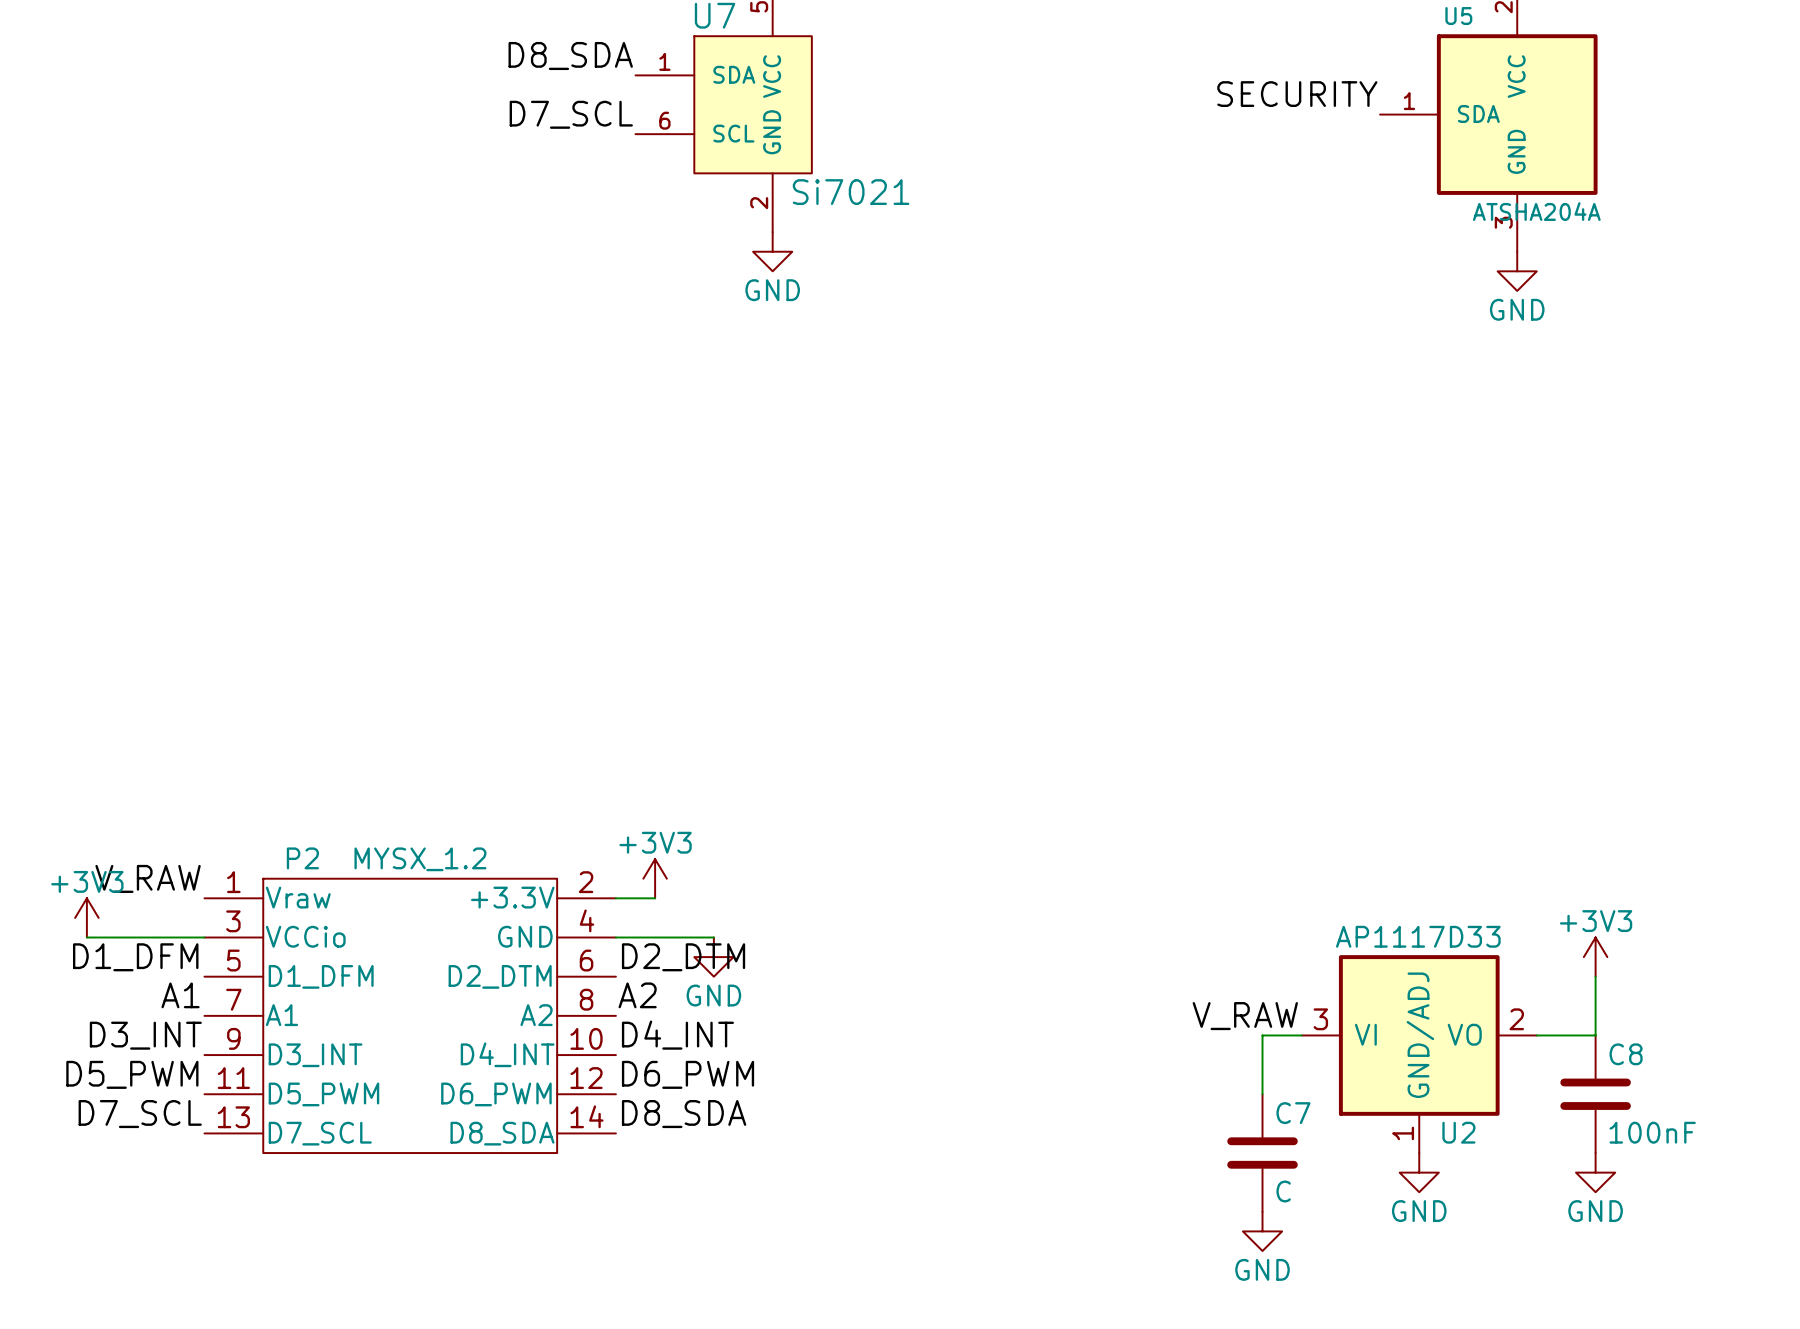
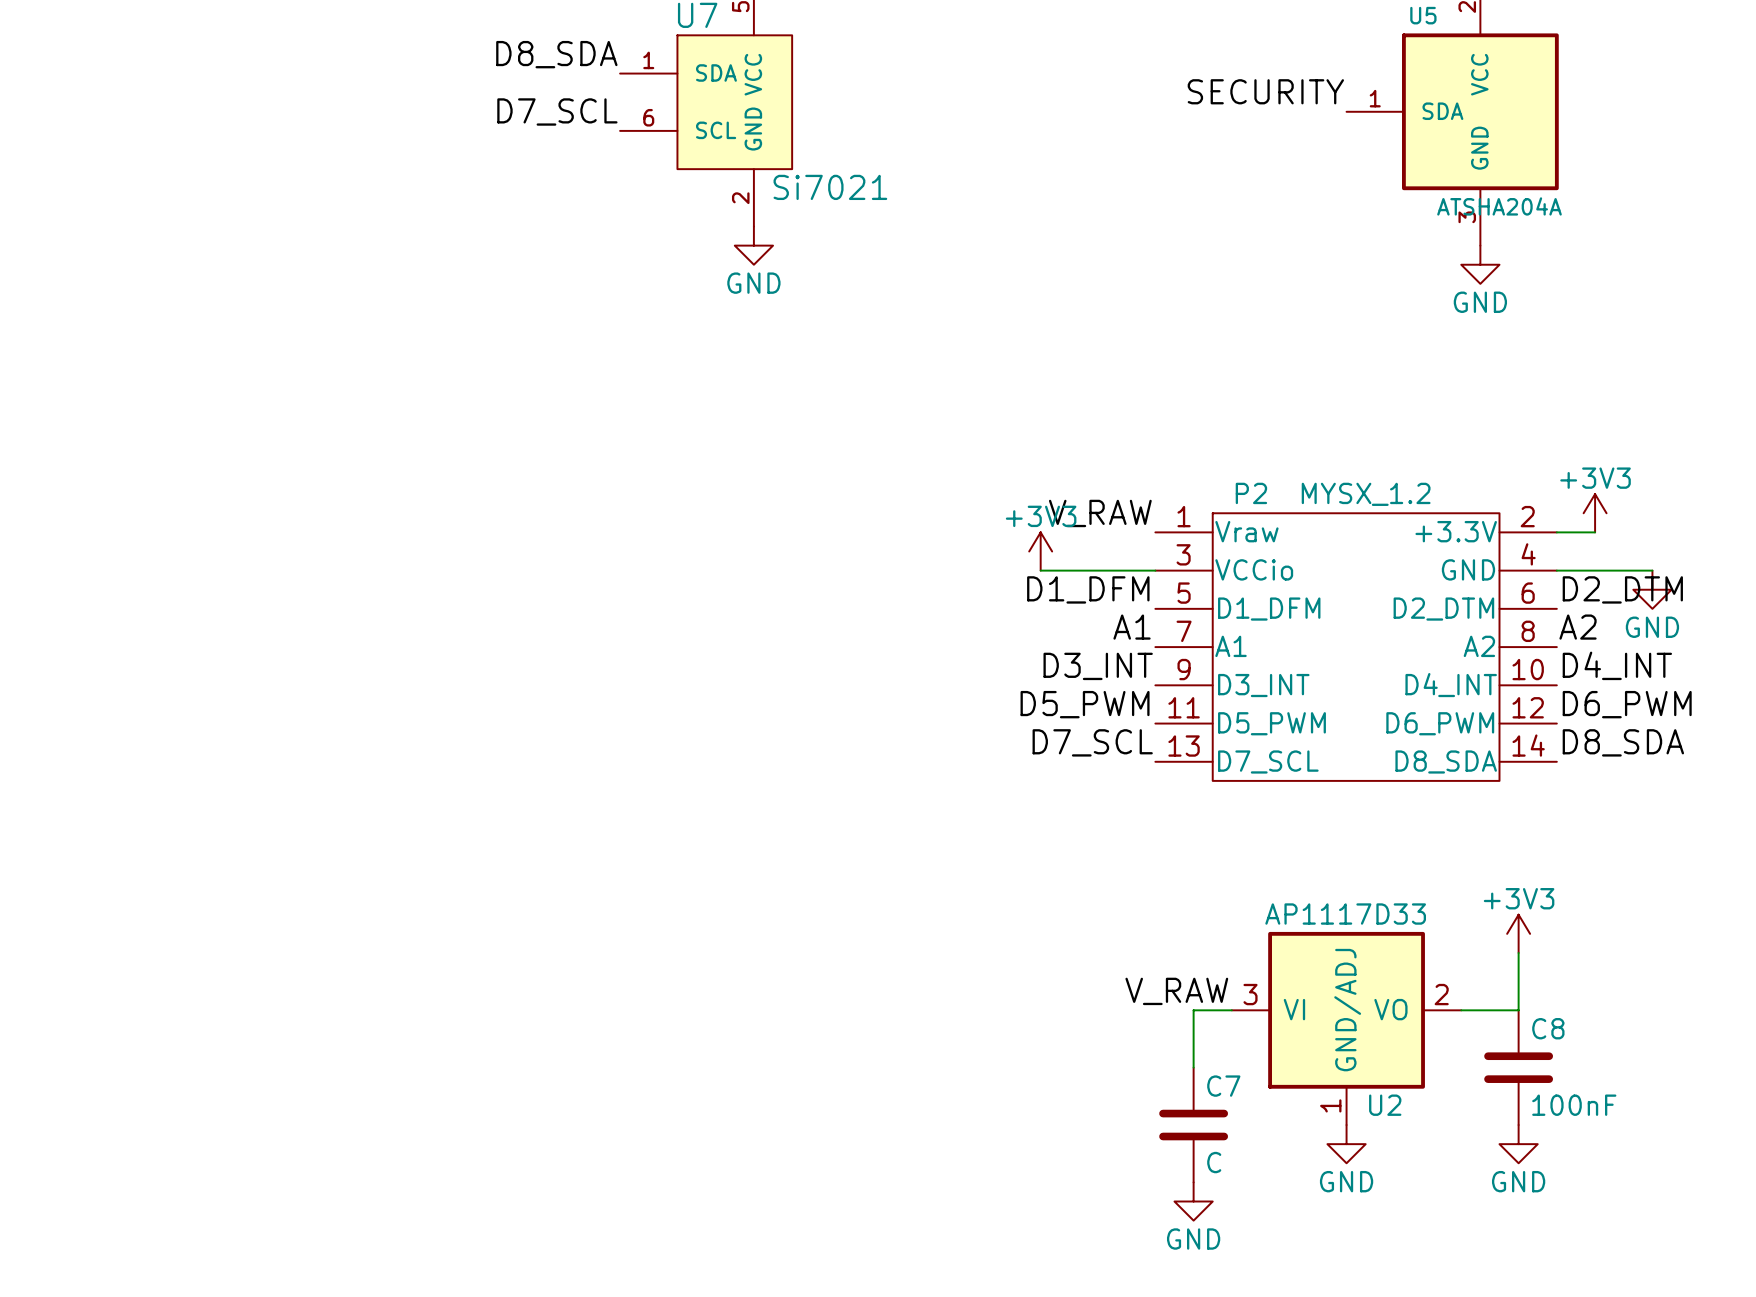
label: none -> V_RAW (1100, 513)
power symbol: none -> +3V3 (1595, 513)
wire: none -> (1556, 532) (1595, 532)
power symbol: none -> +3V3 (1040, 551)
wire: none -> (1040, 570) (1155, 570)
wire: none -> (1556, 570) (1652, 570)
label: none -> D1_DFM (1088, 589)
label: none -> D2_DTM (1622, 589)
power symbol: none -> GND (1652, 589)
label: none -> A1 (1132, 627)
label: none -> A2 (1578, 627)
label: none -> D3_INT (1098, 666)
label: none -> D4_INT (1617, 665)
label: none -> D5_PWM (1085, 704)
label: none -> D6_PWM (1627, 704)
label: none -> D7_SCL (1092, 742)
label: none -> D8_SDA (1623, 742)
label: V_RAW (148, 878) -> none
power symbol: +3V3 (655, 878) -> none
wire: (615, 898) (655, 898) -> none
power symbol: +3V3 (86, 917) -> none
wire: (86, 937) (204, 937) -> none
wire: (615, 937) (713, 937) -> none
label: D1_DFM (135, 957) -> none
label: D2_DTM (683, 957) -> none
power symbol: GND (713, 957) -> none
power symbol position: +3V3 (1595, 957) -> +3V3 (1518, 933)
wire: (1595, 976) (1595, 1035) (1556, 1035) -> (1518, 952) (1518, 1010)
label: A1 (180, 995) -> none
label: A2 (637, 995) -> none
P2 position: (410, 1015) -> (1356, 647)
label position: V_RAW (1245, 1016) -> V_RAW (1176, 991)
label: D3_INT (145, 1035) -> none
label: D4_INT (677, 1035) -> none
wire: (1301, 1035) (1262, 1035) (1262, 1094) -> (1231, 1010) (1193, 1010) (1193, 1067)
U2 position: (1419, 1054) -> (1346, 1028)
label: D5_PWM (132, 1074) -> none
label: D6_PWM (688, 1074) -> none
C8 position: (1595, 1094) -> (1518, 1067)
label: D7_SCL (140, 1114) -> none
label: D8_SDA (684, 1114) -> none
C7 position: (1262, 1153) -> (1193, 1125)
power symbol position: GND (1419, 1172) -> GND (1346, 1144)
power symbol position: GND (1595, 1172) -> GND (1518, 1144)
power symbol position: GND (1262, 1231) -> GND (1193, 1201)

